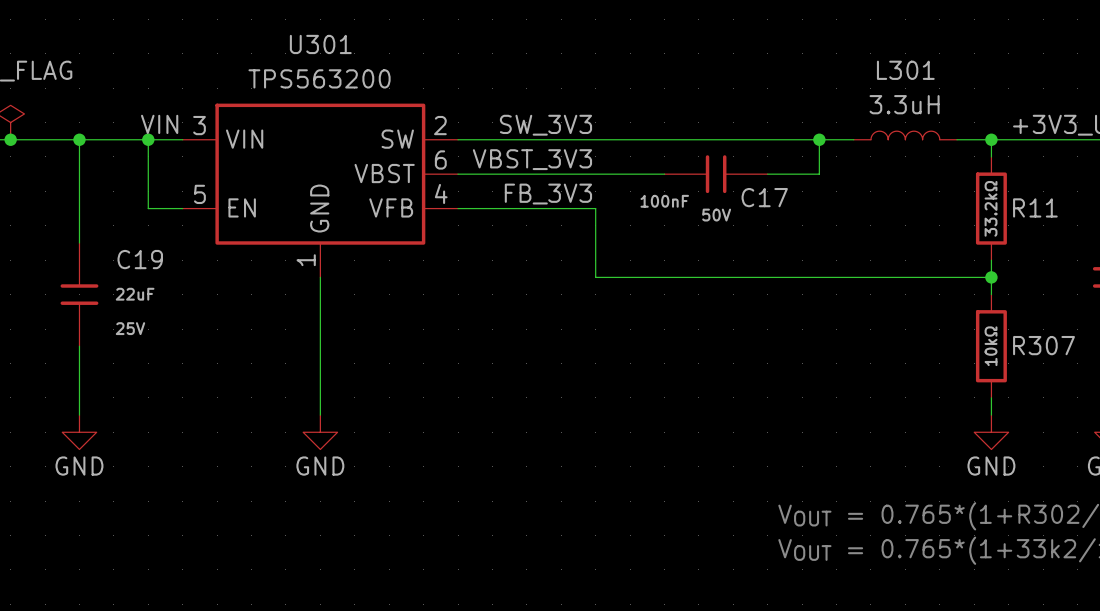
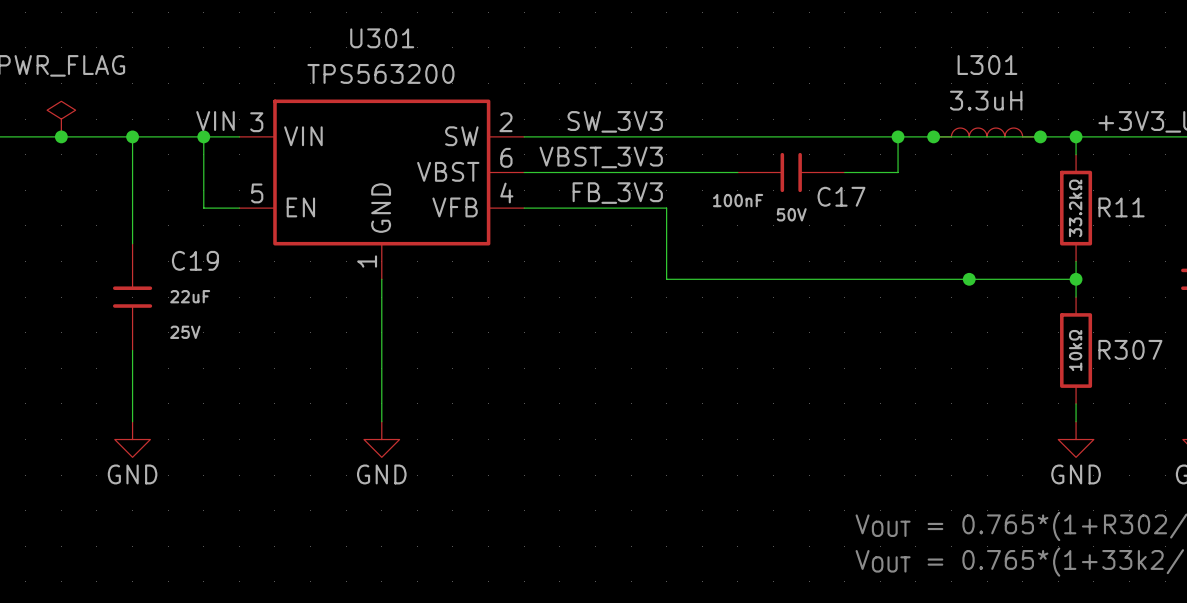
wire: none -> (933, 136) (1040, 136)
junction: none -> (933, 136)
junction: none -> (1040, 136)
junction: none -> (969, 279)

